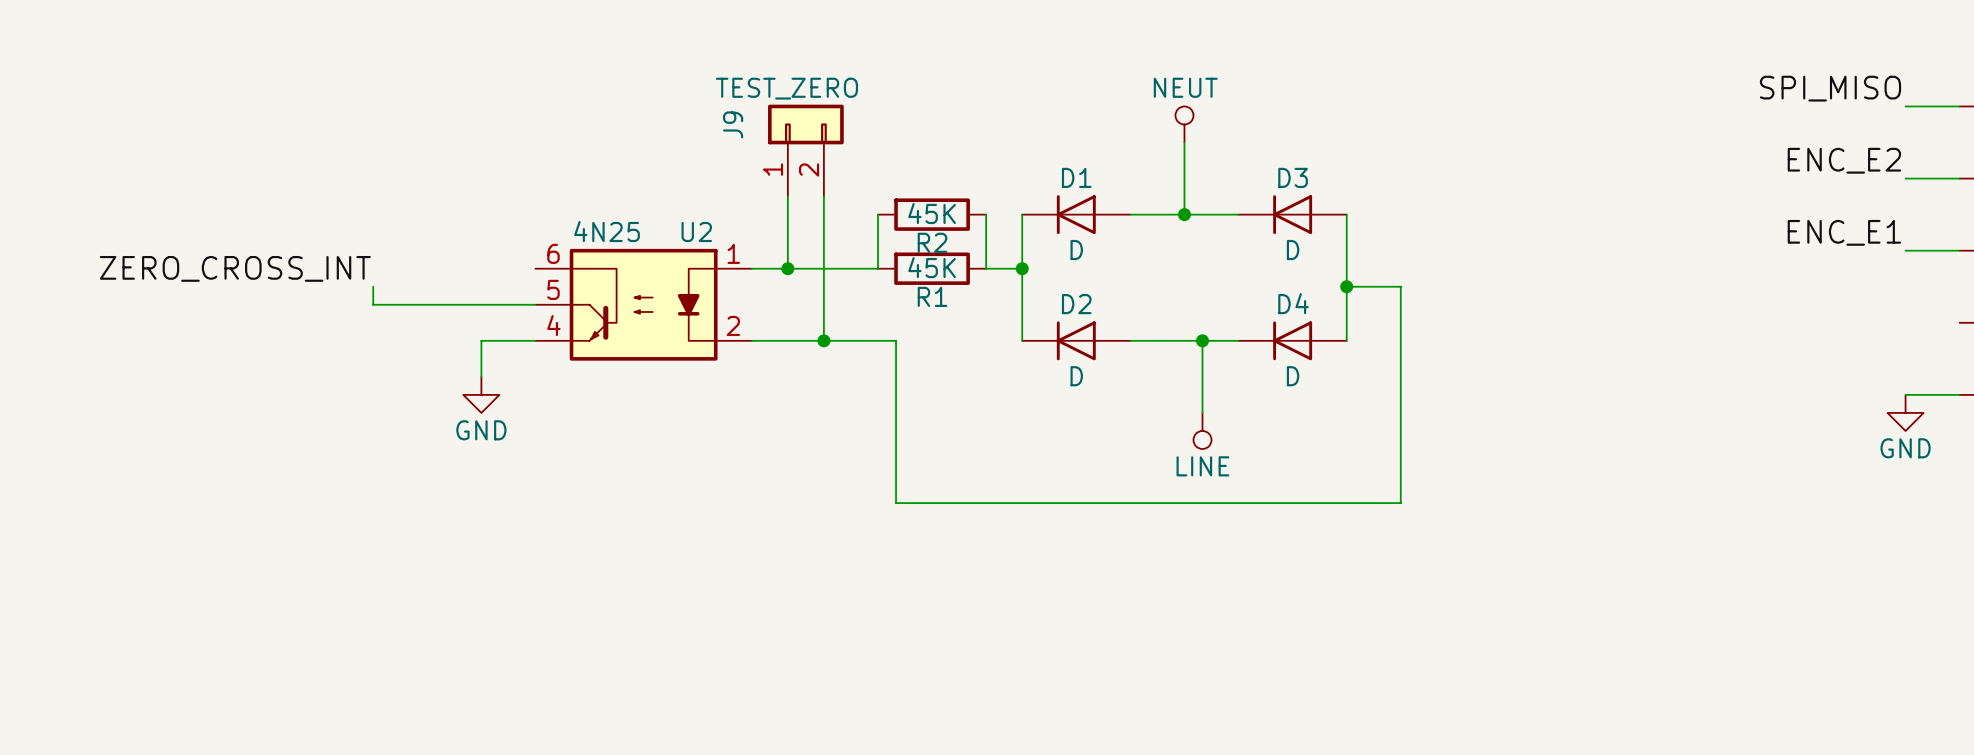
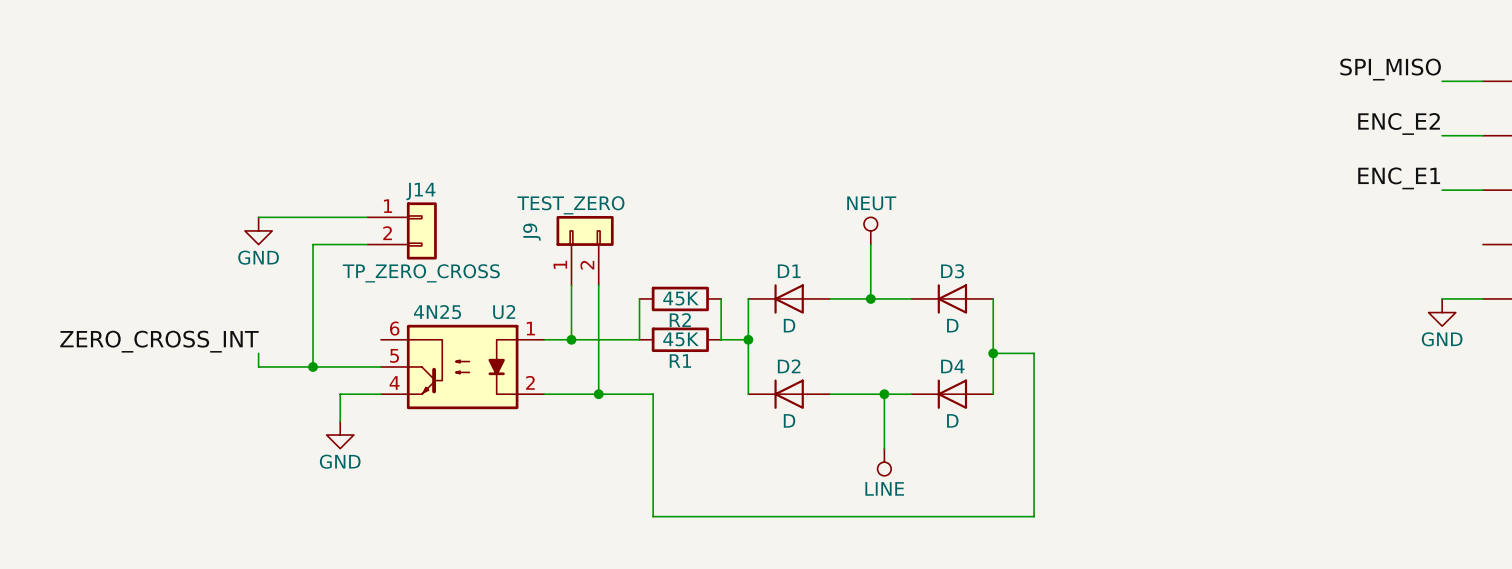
power symbol position: NEUT (1184, 124) -> NEUT (870, 230)
wire: (1184, 142) (1184, 214) -> (870, 244) (870, 298)
J9 position: (805, 150) -> (585, 250)
wire: (787, 196) (787, 268) -> (571, 285) (571, 339)
wire: (823, 196) (823, 340) -> (598, 285) (598, 394)
wire: (878, 214) (878, 268) (751, 268) -> (639, 298) (639, 339) (544, 339)
R2 position: (932, 214) -> (680, 298)
wire: (986, 214) (986, 268) (1022, 268) -> (721, 298) (721, 339) (748, 339)
wire: (1022, 214) (1022, 340) -> (748, 298) (748, 394)
D1 position: (1076, 214) -> (789, 298)
wire: (1130, 214) (1238, 214) -> (829, 298) (911, 298)
junction: (1184, 214) -> none
D3 position: (1292, 214) -> (952, 298)
wire: (1346, 214) (1346, 340) -> (993, 298) (993, 394)
label position: ZERO_CROSS_INT (235, 268) -> ZERO_CROSS_INT (159, 341)
junction: (787, 268) -> none
R1 position: (932, 268) -> (680, 339)
junction: (1022, 268) -> none
wire: none -> (258, 217) (367, 217)
wire: (373, 286) (373, 304) (535, 304) -> (258, 353) (258, 366) (381, 366)
wire: (1346, 286) (1400, 286) (1400, 503) (896, 503) (896, 340) (751, 340) -> (993, 353) (1034, 353) (1034, 516) (653, 516) (653, 394) (544, 394)
junction: (1346, 286) -> none
power symbol: none -> GND (258, 230)
J14: none -> TP_ZERO_CROSS (402, 230)
U2 position: (643, 304) -> (462, 366)
wire: none -> (367, 244) (313, 244) (313, 366)
wire: (535, 340) (481, 340) (481, 376) -> (381, 394) (340, 394) (340, 421)
junction: (823, 340) -> none
D2 position: (1076, 340) -> (789, 394)
wire: (1130, 340) (1238, 340) -> (829, 394) (911, 394)
wire: (1202, 340) (1202, 412) -> (884, 394) (884, 448)
junction position: (1202, 340) -> (870, 298)
D4 position: (1292, 340) -> (952, 394)
power symbol: GND (481, 394) -> none
power symbol position: LINE (1202, 430) -> LINE (884, 462)
junction: none -> (571, 339)
junction: none -> (748, 339)
junction: none -> (993, 353)
junction: none -> (313, 366)
junction: none -> (598, 394)
junction: none -> (884, 394)
power symbol: none -> GND (340, 435)

